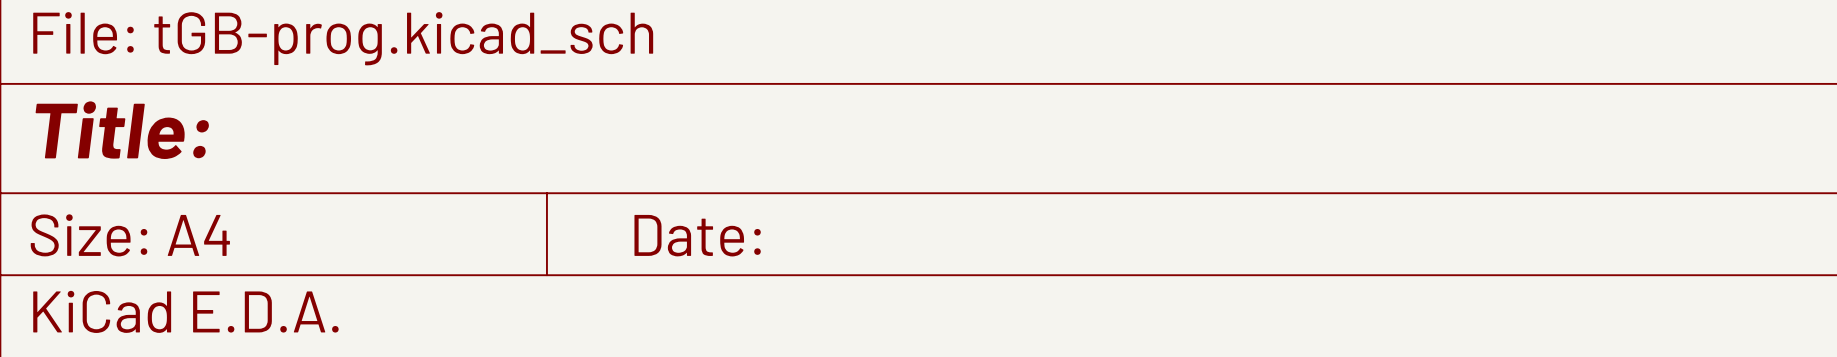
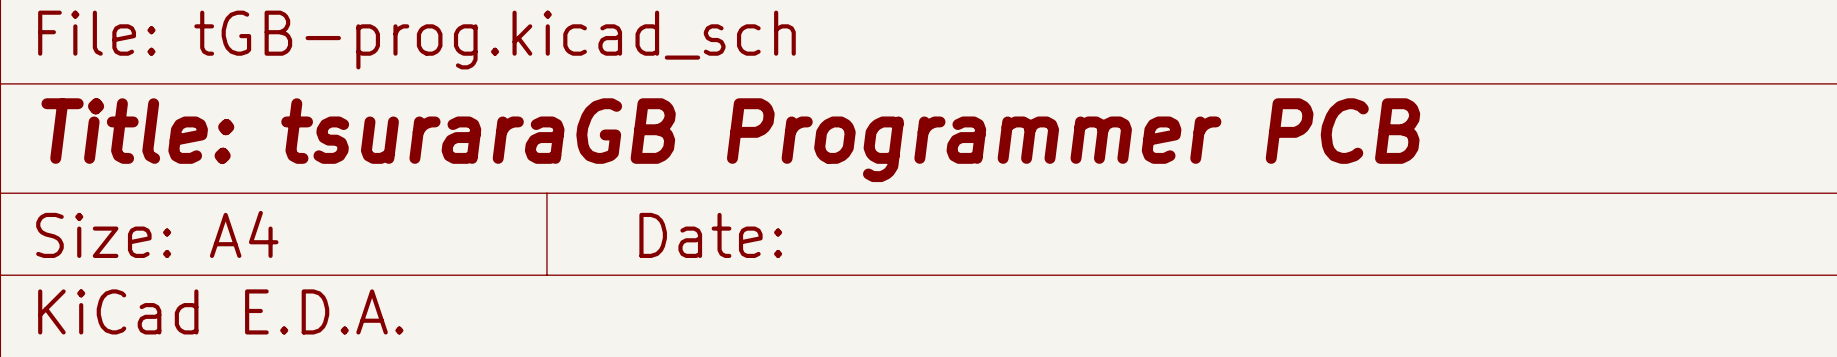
title block: Title: (122, 130) -> Title: tsuraraGB Programmer PCB (730, 140)

